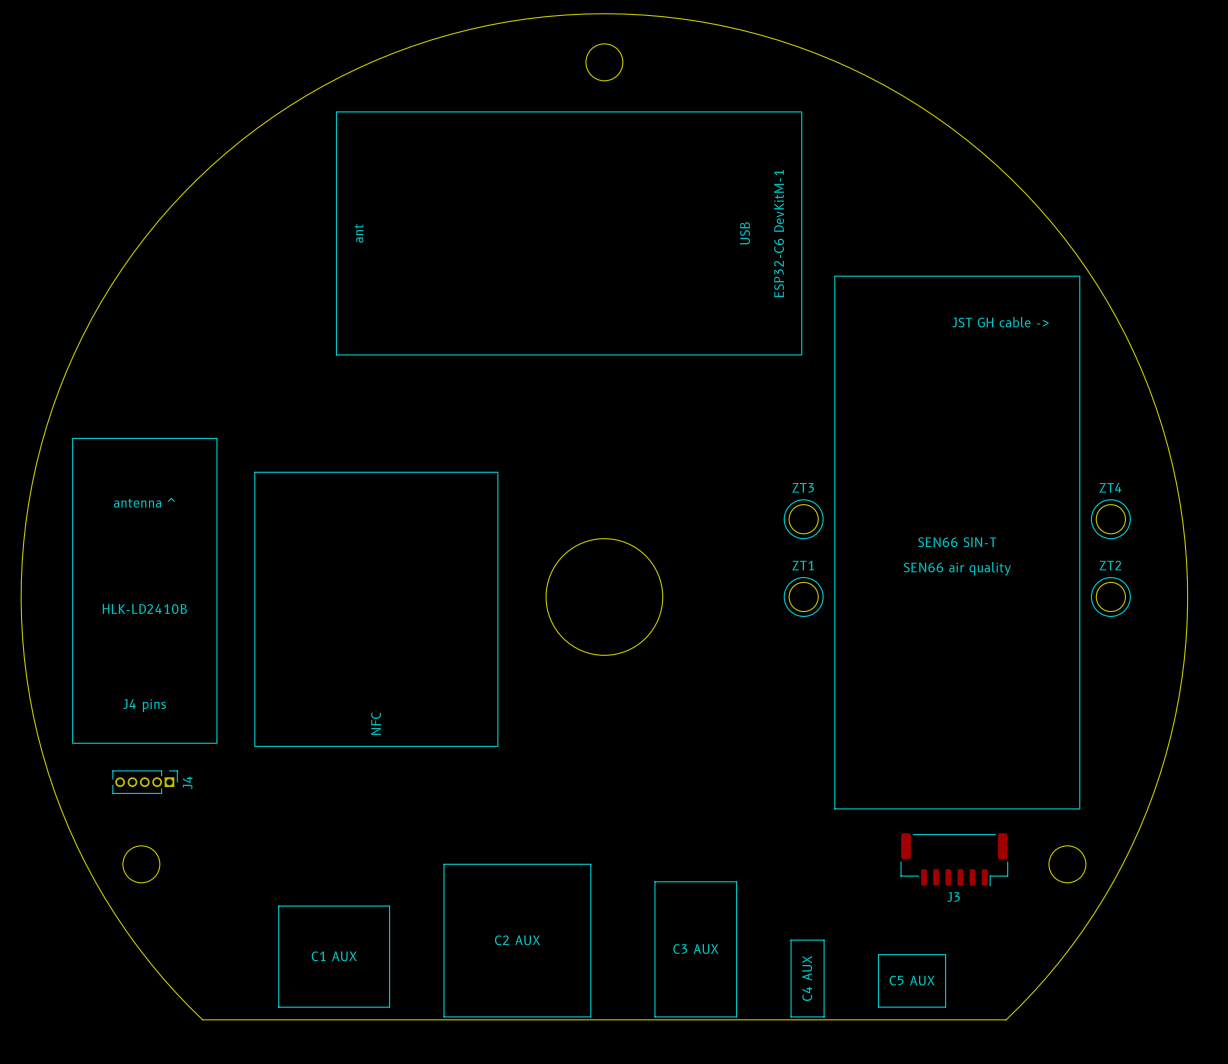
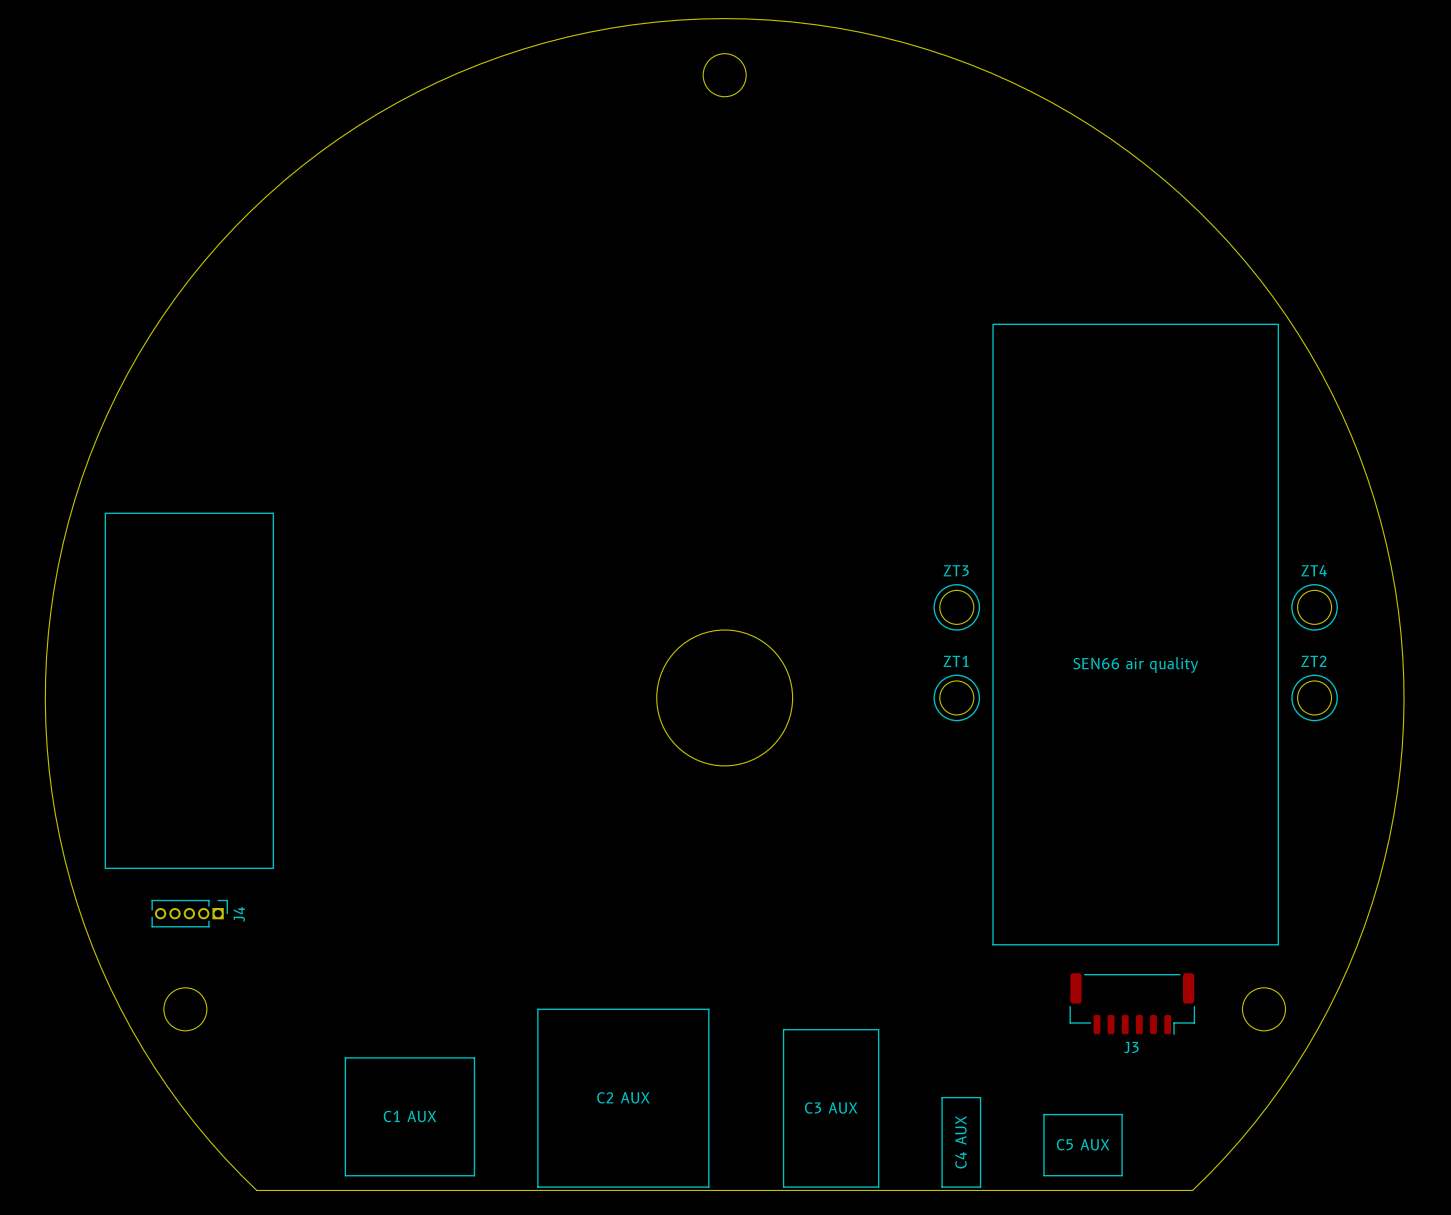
drawing: [335, 111, 803, 356] -> none
drawing shape: [834, 275, 1081, 810] -> [992, 323, 1280, 946]
drawing shape: [72, 437, 218, 744] -> [104, 512, 275, 870]
drawing: [254, 471, 499, 747] -> none

